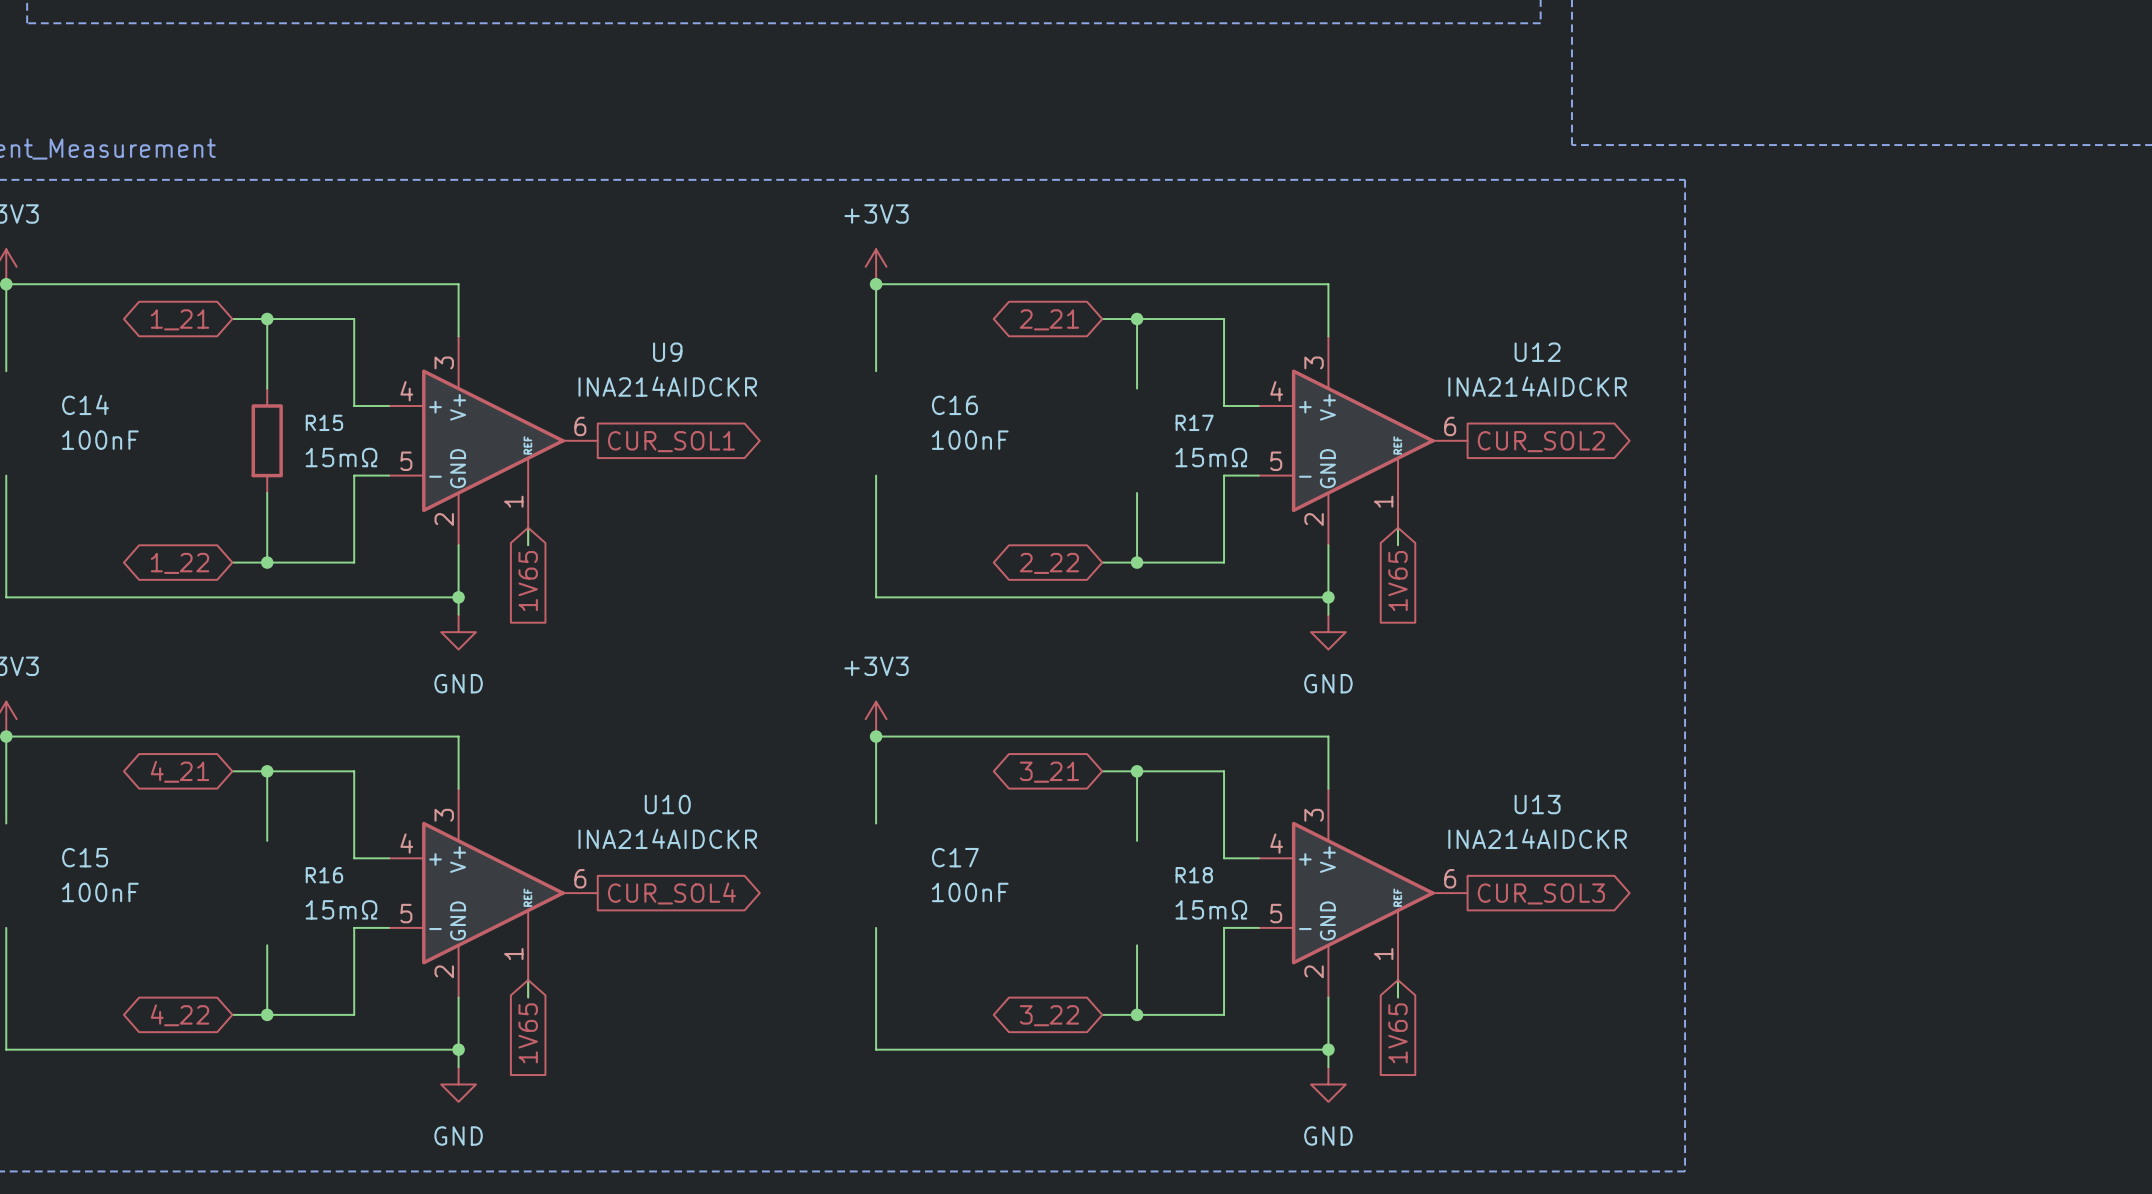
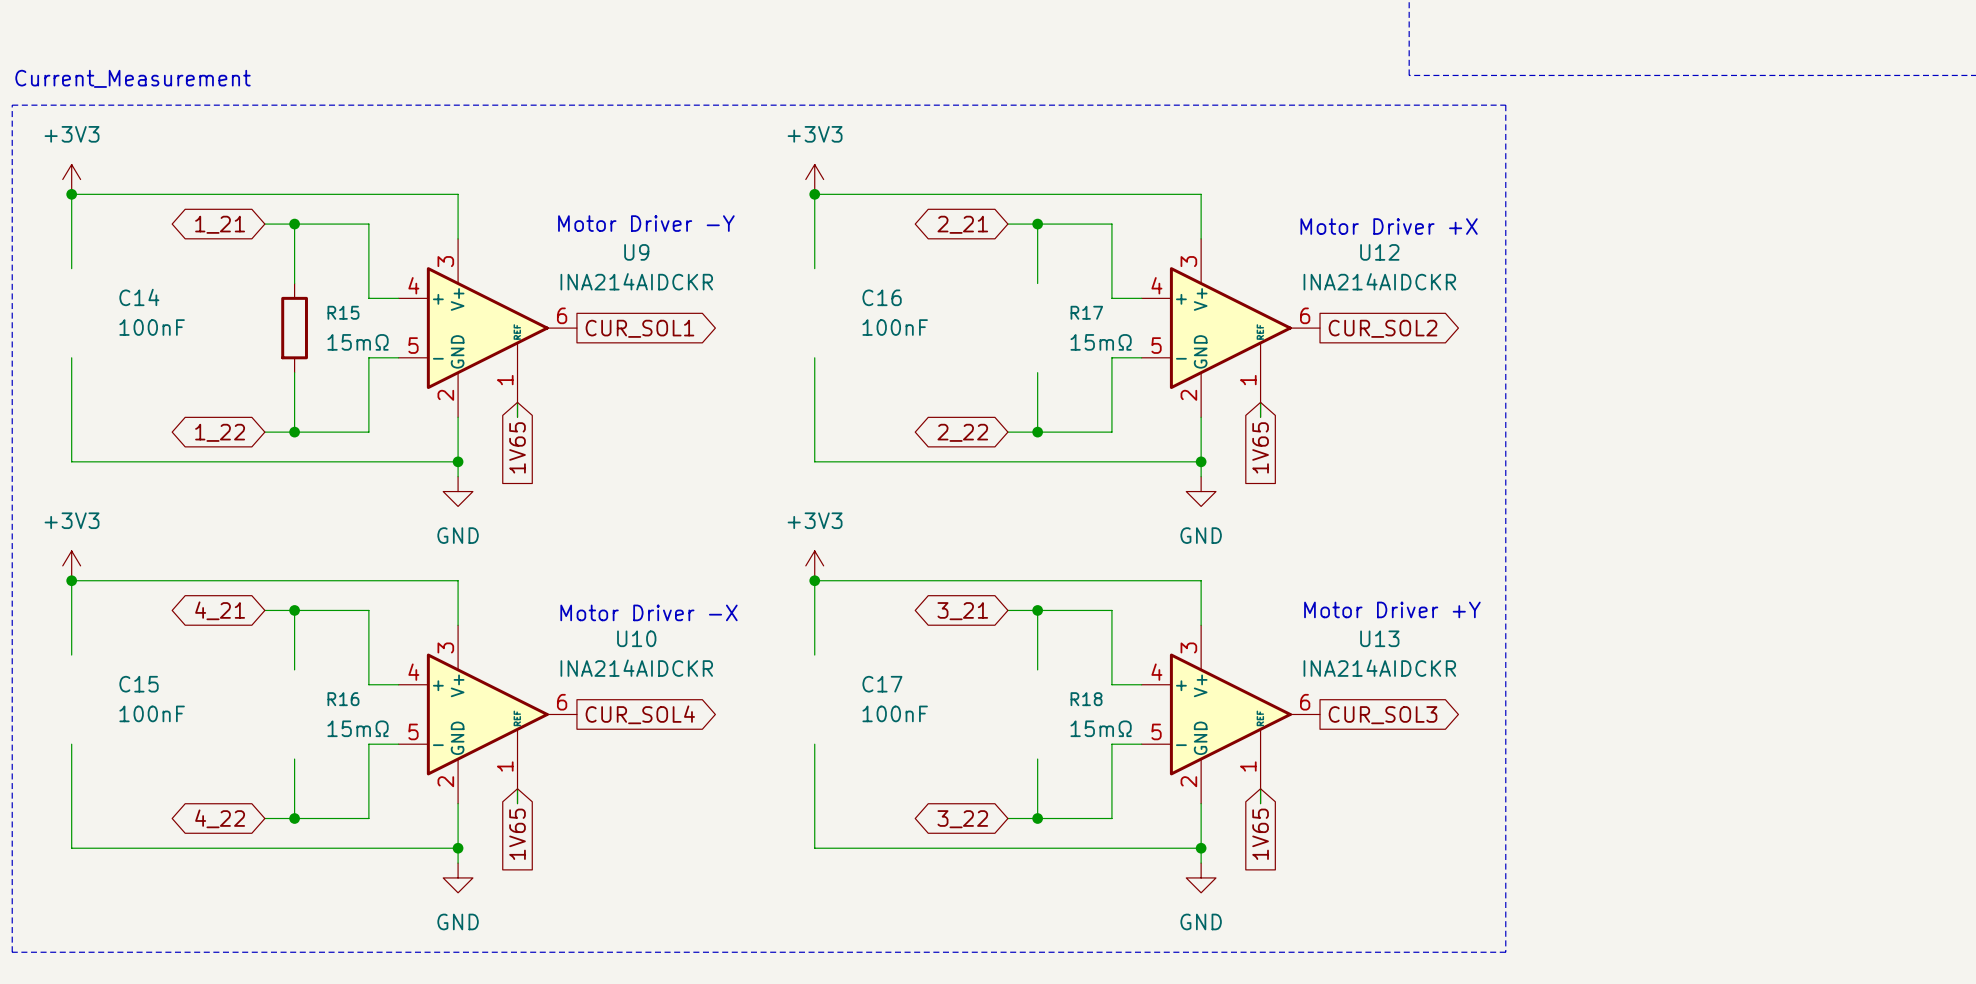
text: none -> Motor Driver -Y (646, 223)
text: none -> Motor Driver +X (1389, 226)
text: none -> Motor Driver +Y (1392, 609)
text: none -> Motor Driver -X (649, 612)

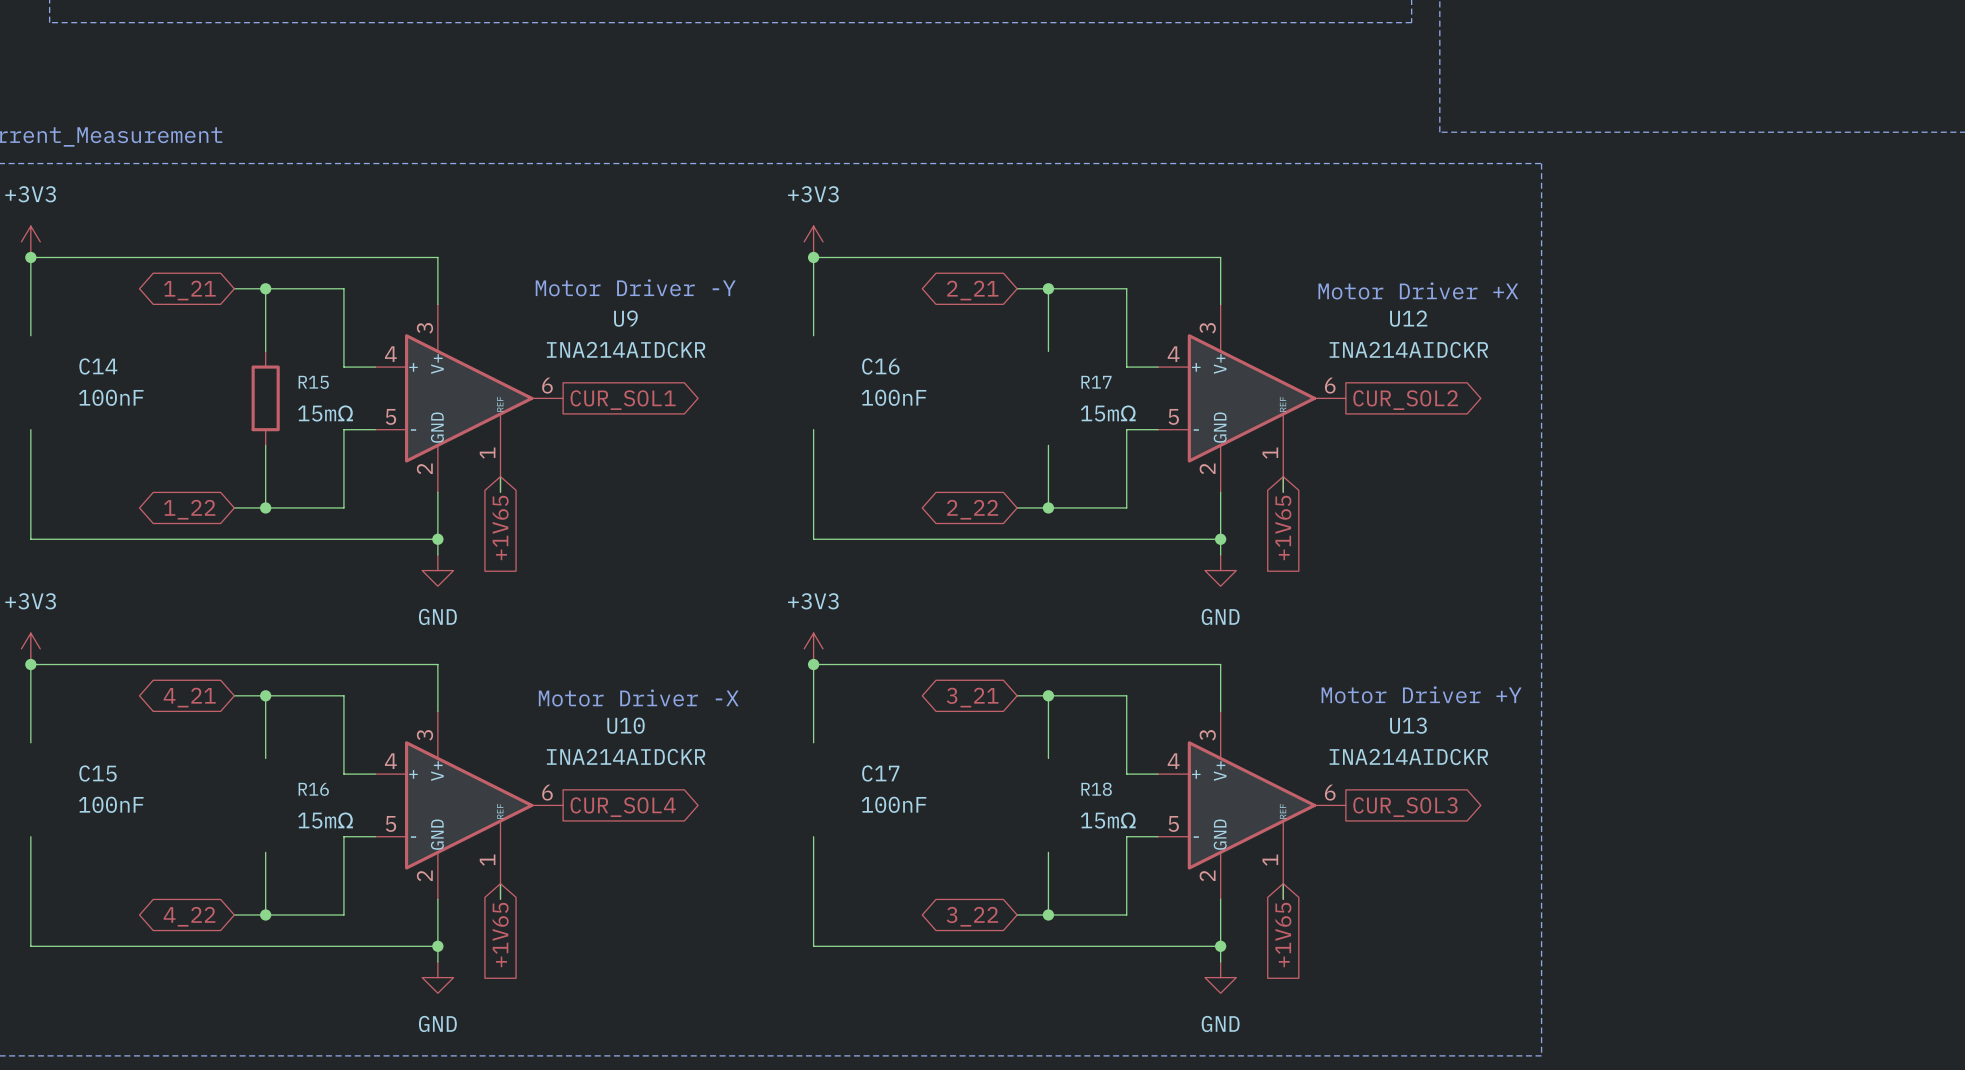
global label: 1V65 (517, 447) -> +1V65 (500, 527)
global label: 1V65 (1260, 447) -> +1V65 (1283, 527)
global label: 1V65 (517, 834) -> +1V65 (500, 935)
global label: 1V65 (1260, 834) -> +1V65 (1283, 935)

